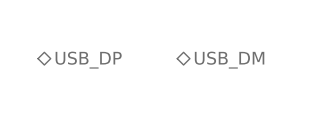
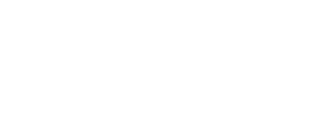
hierarchical label: USB_DP (88, 60) -> none
hierarchical label: USB_DM (229, 60) -> none

